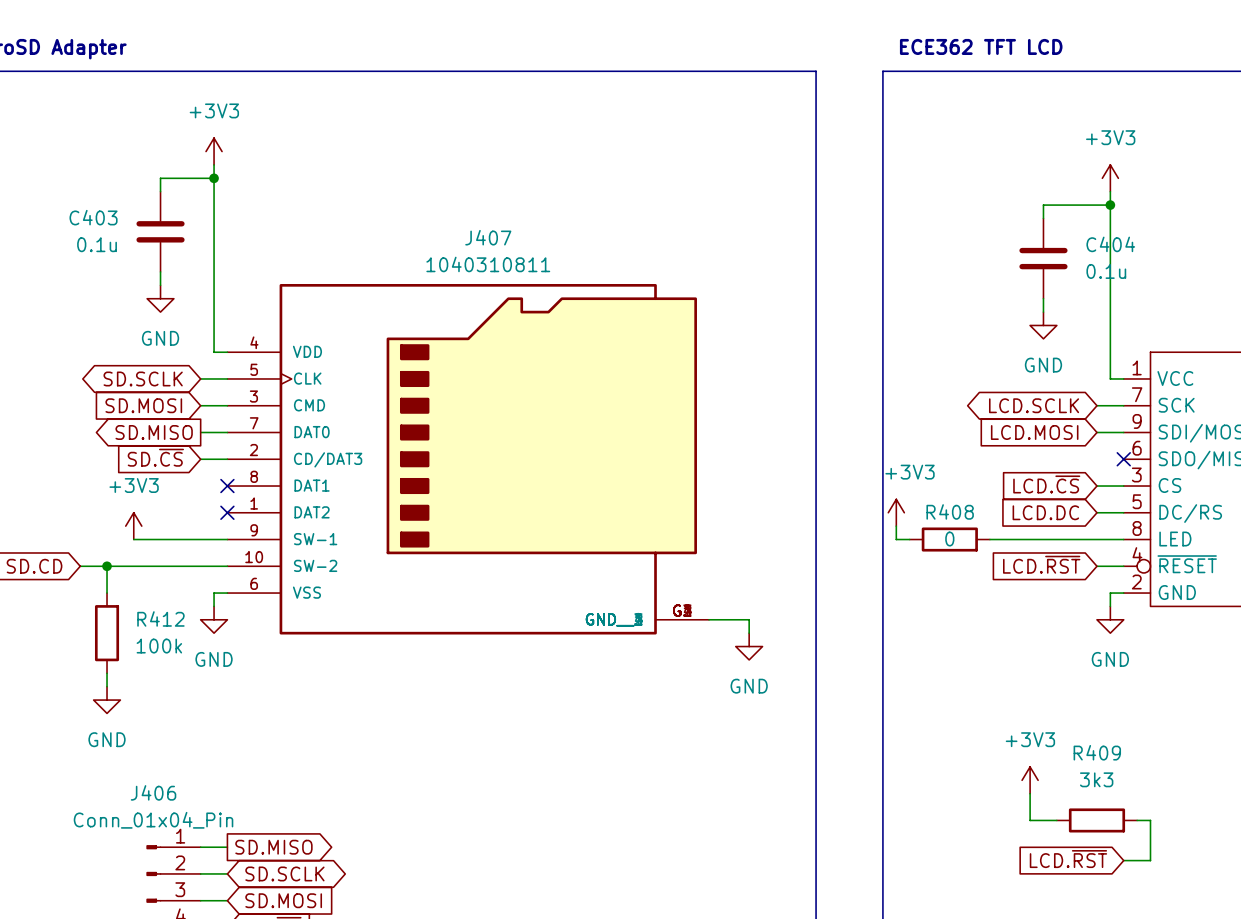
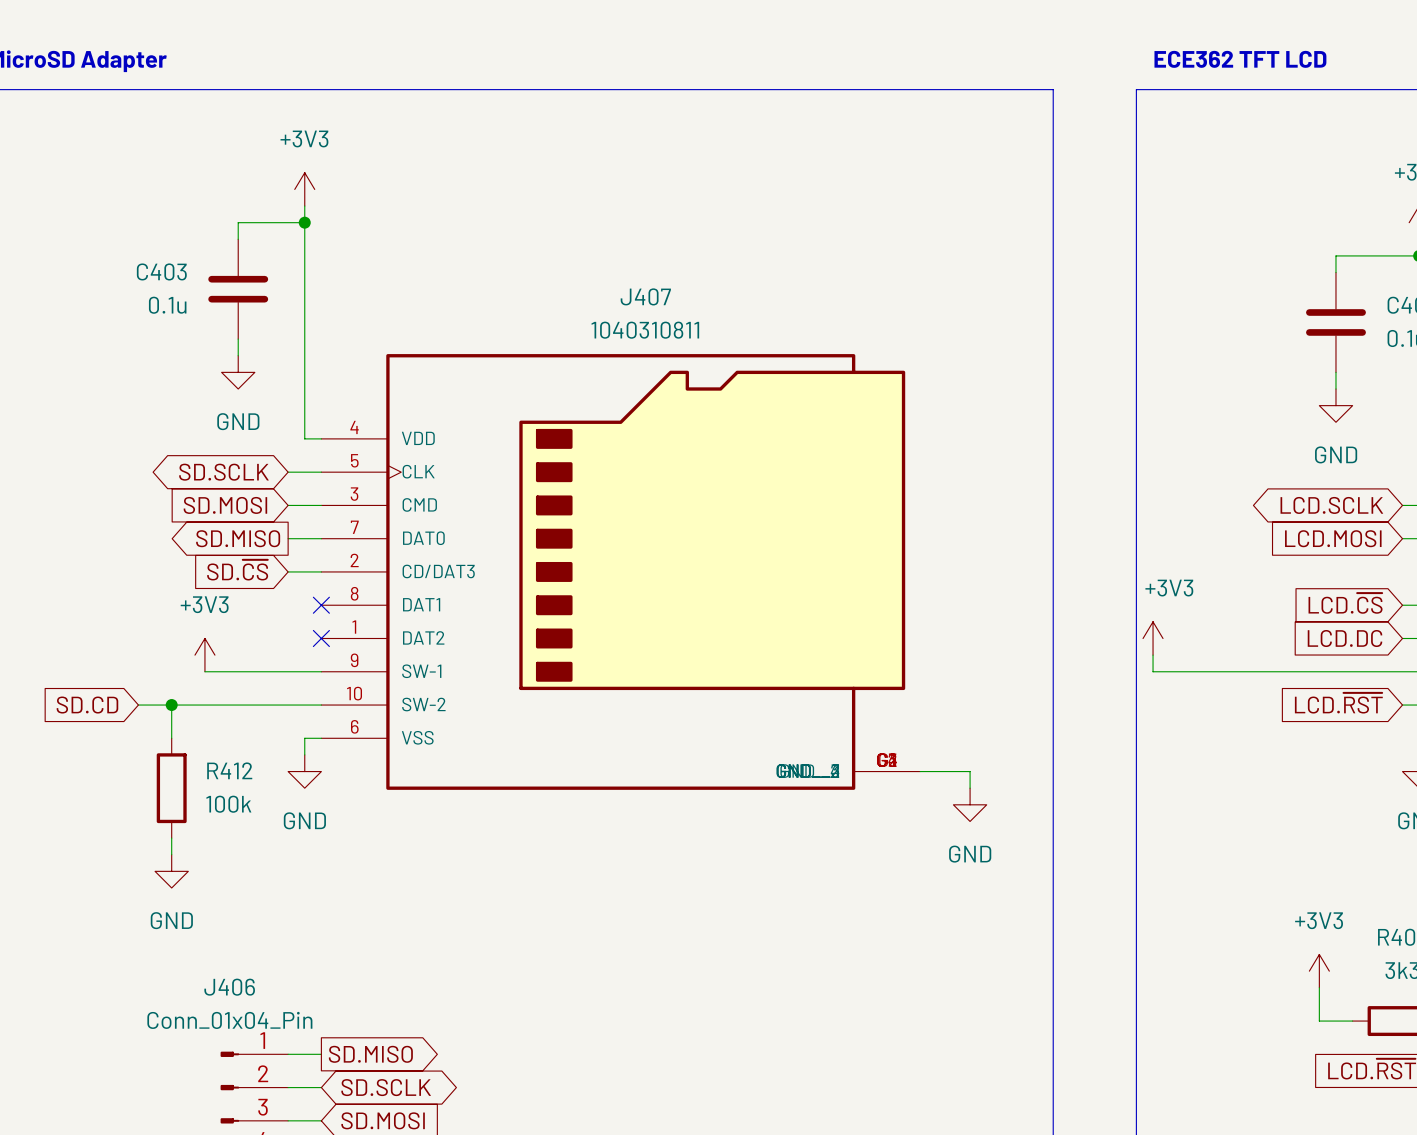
wire: none -> (1169, 671) (1269, 671)
R408: 0 (949, 539) -> none

